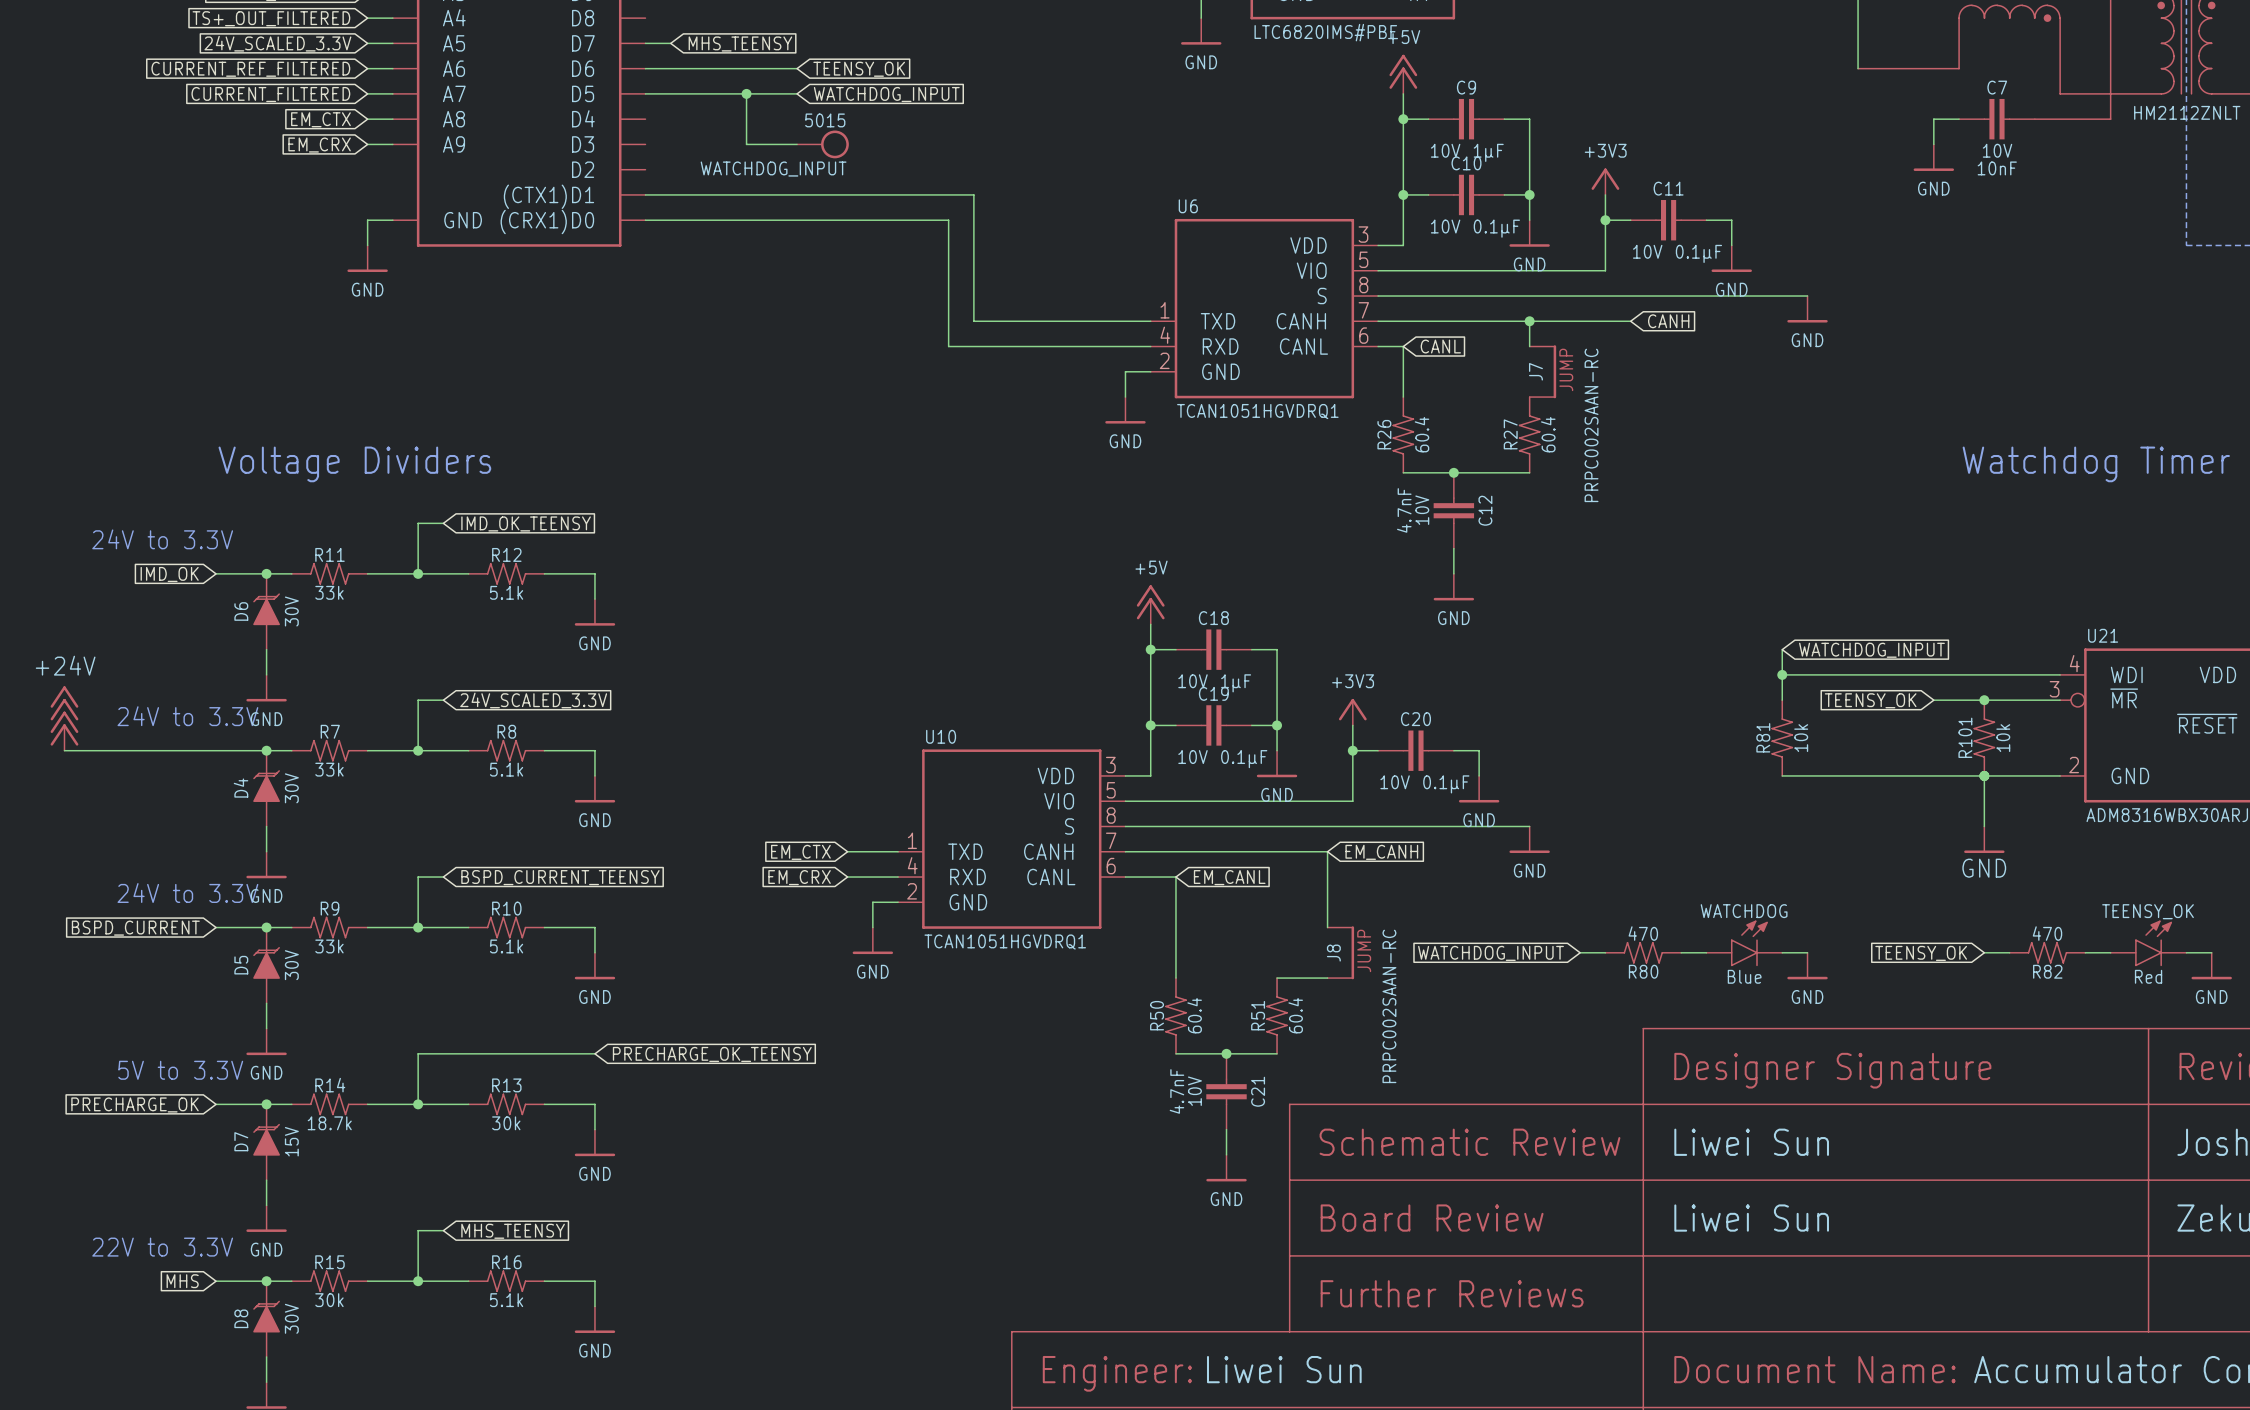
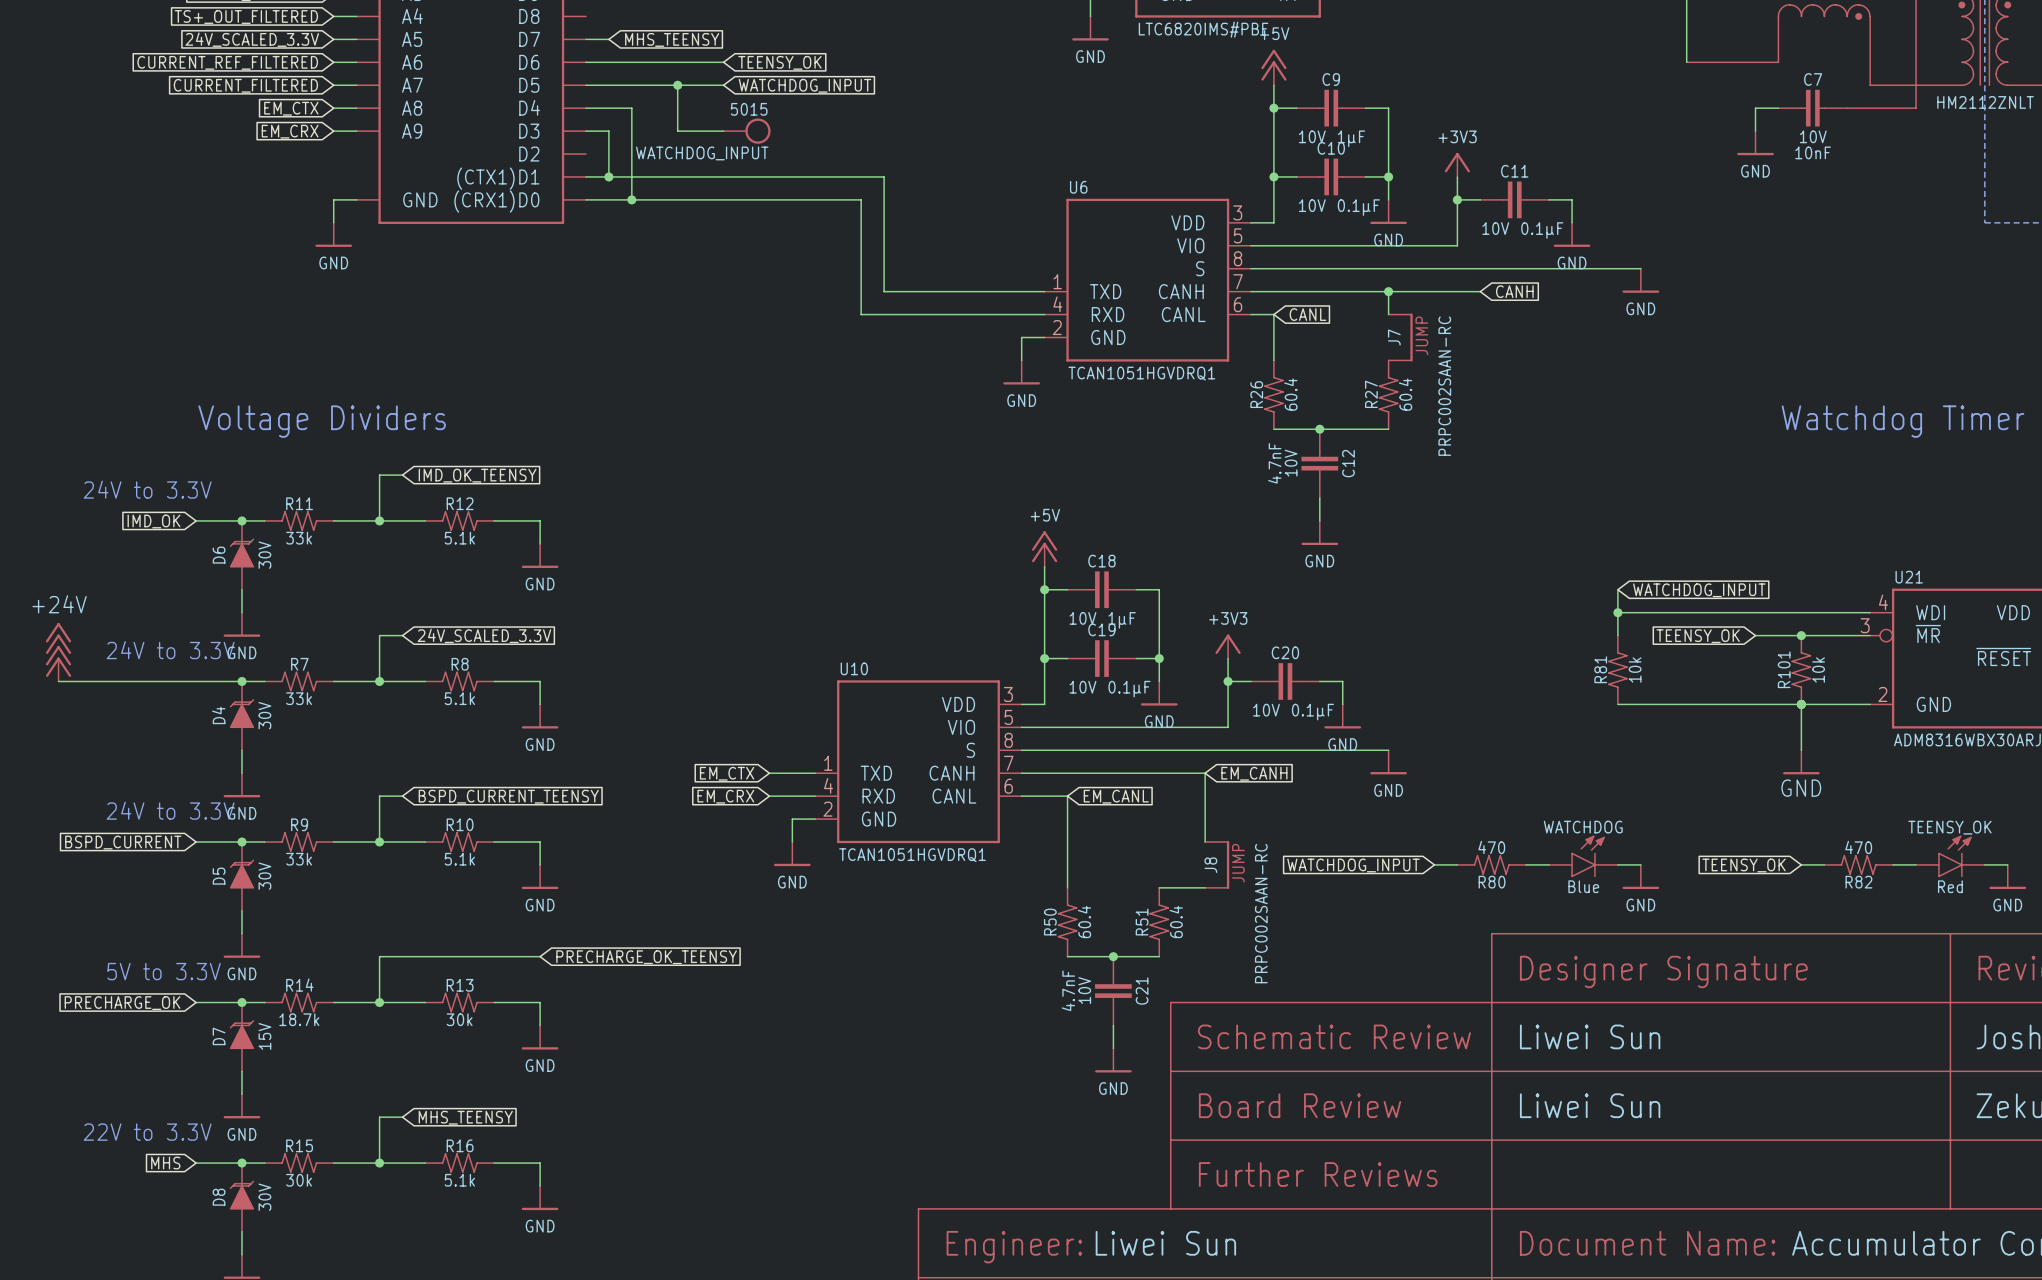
wire: none -> (585, 108) (631, 108) (631, 199)
wire: none -> (585, 131) (608, 131) (608, 176)
junction: none -> (608, 176)
junction: none -> (631, 199)

